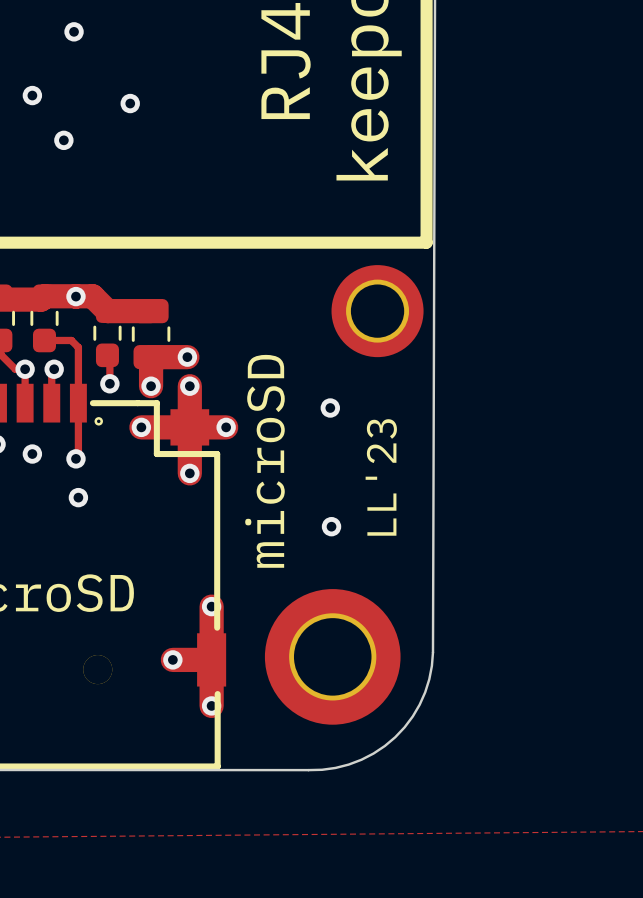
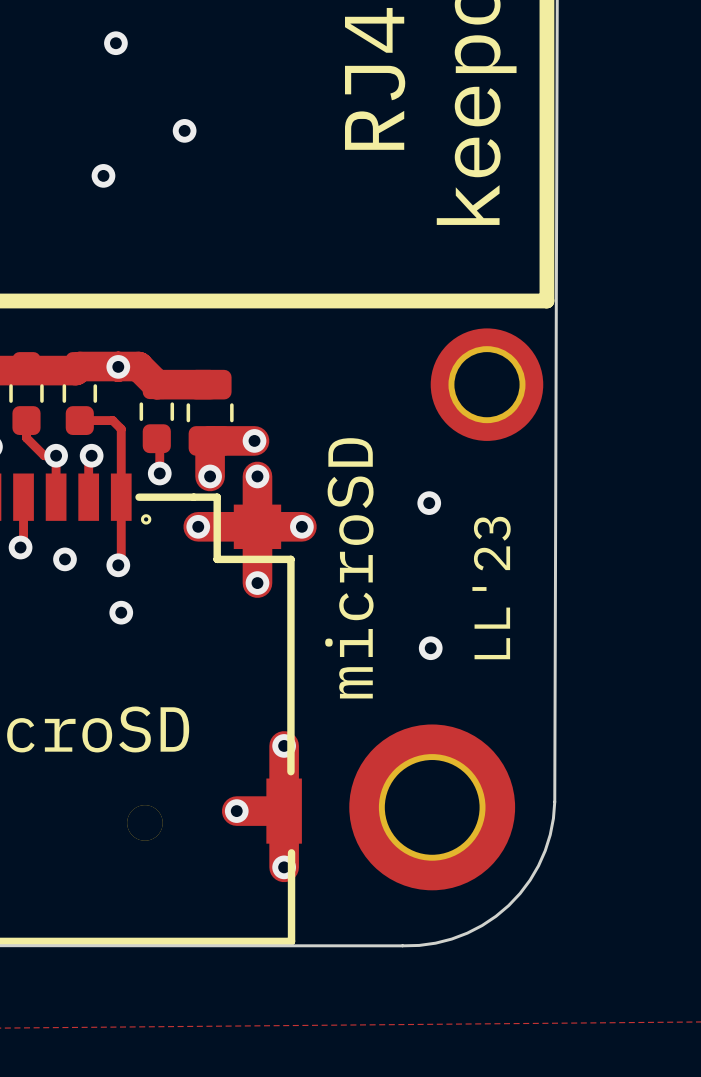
via: (32, 95) -> none

